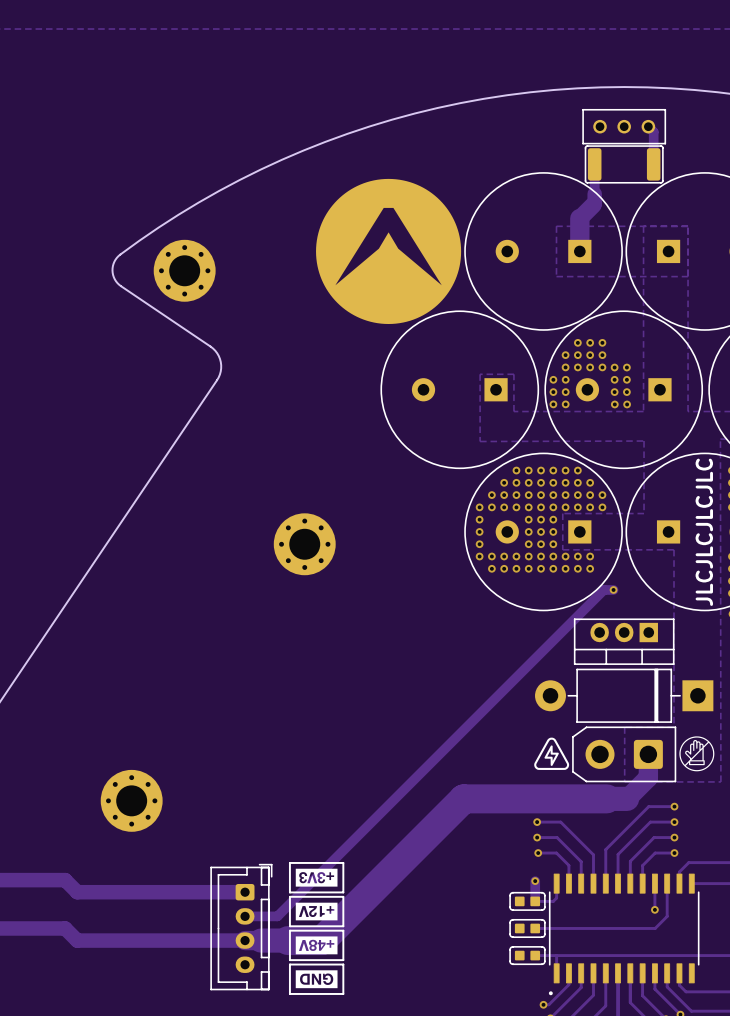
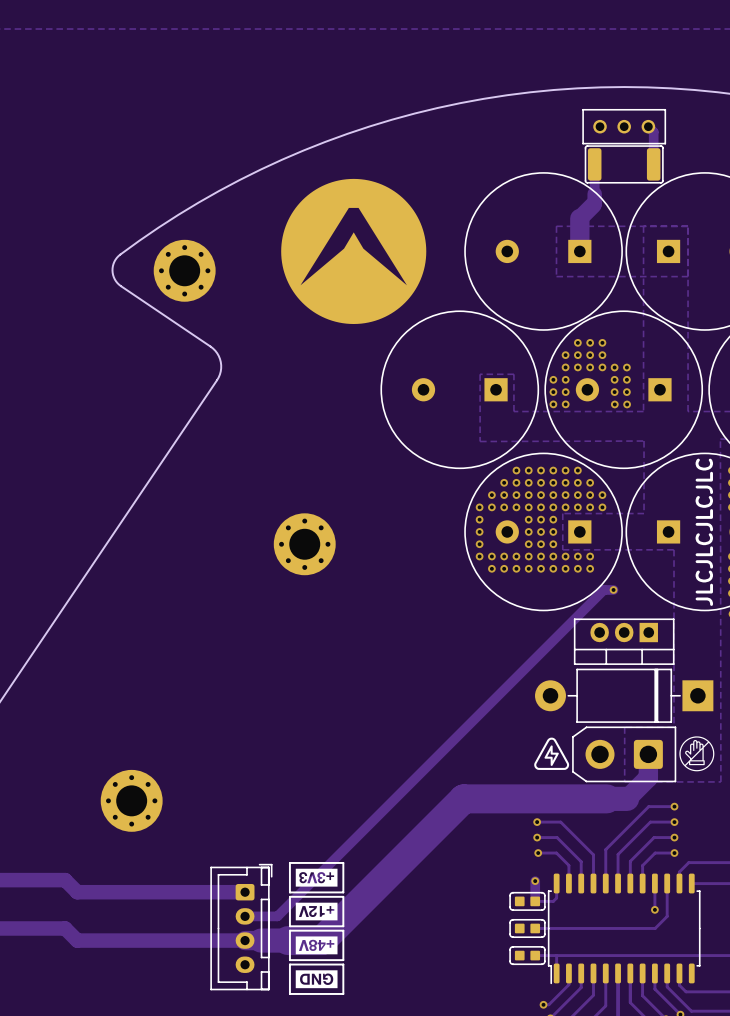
part position: (388, 251) -> (353, 251)
part footprint: [548, 873, 700, 996] -> [548, 873, 701, 984]

